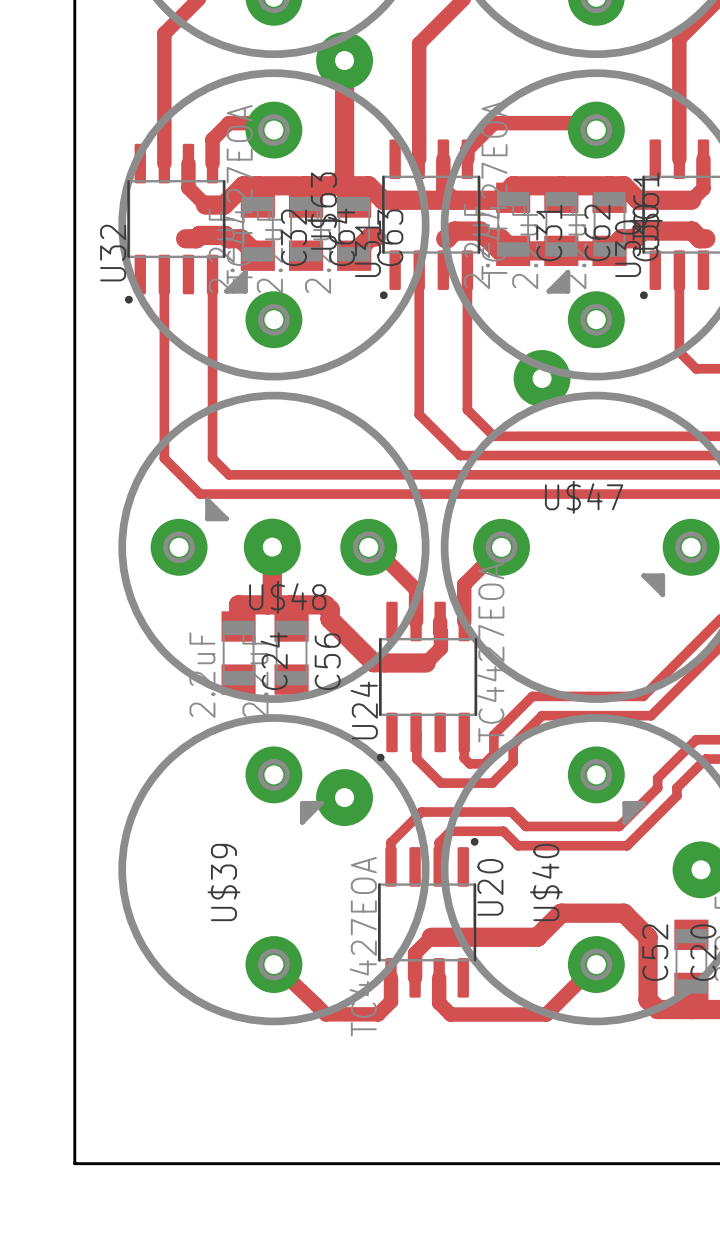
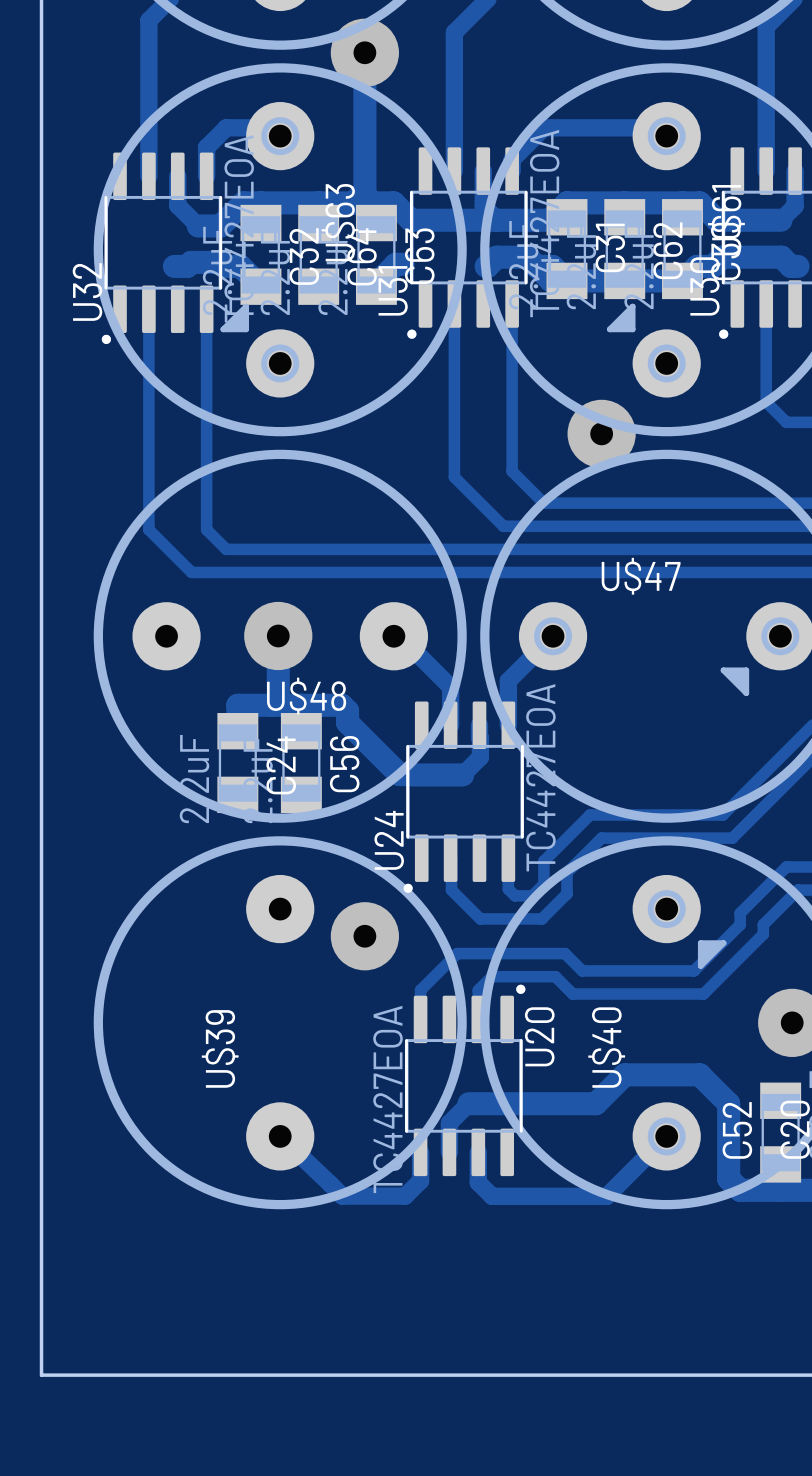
U$48 footprint: [118, 391, 430, 703] -> [93, 449, 467, 823]
U$39 footprint: [118, 714, 430, 1026] -> [93, 836, 467, 1210]

